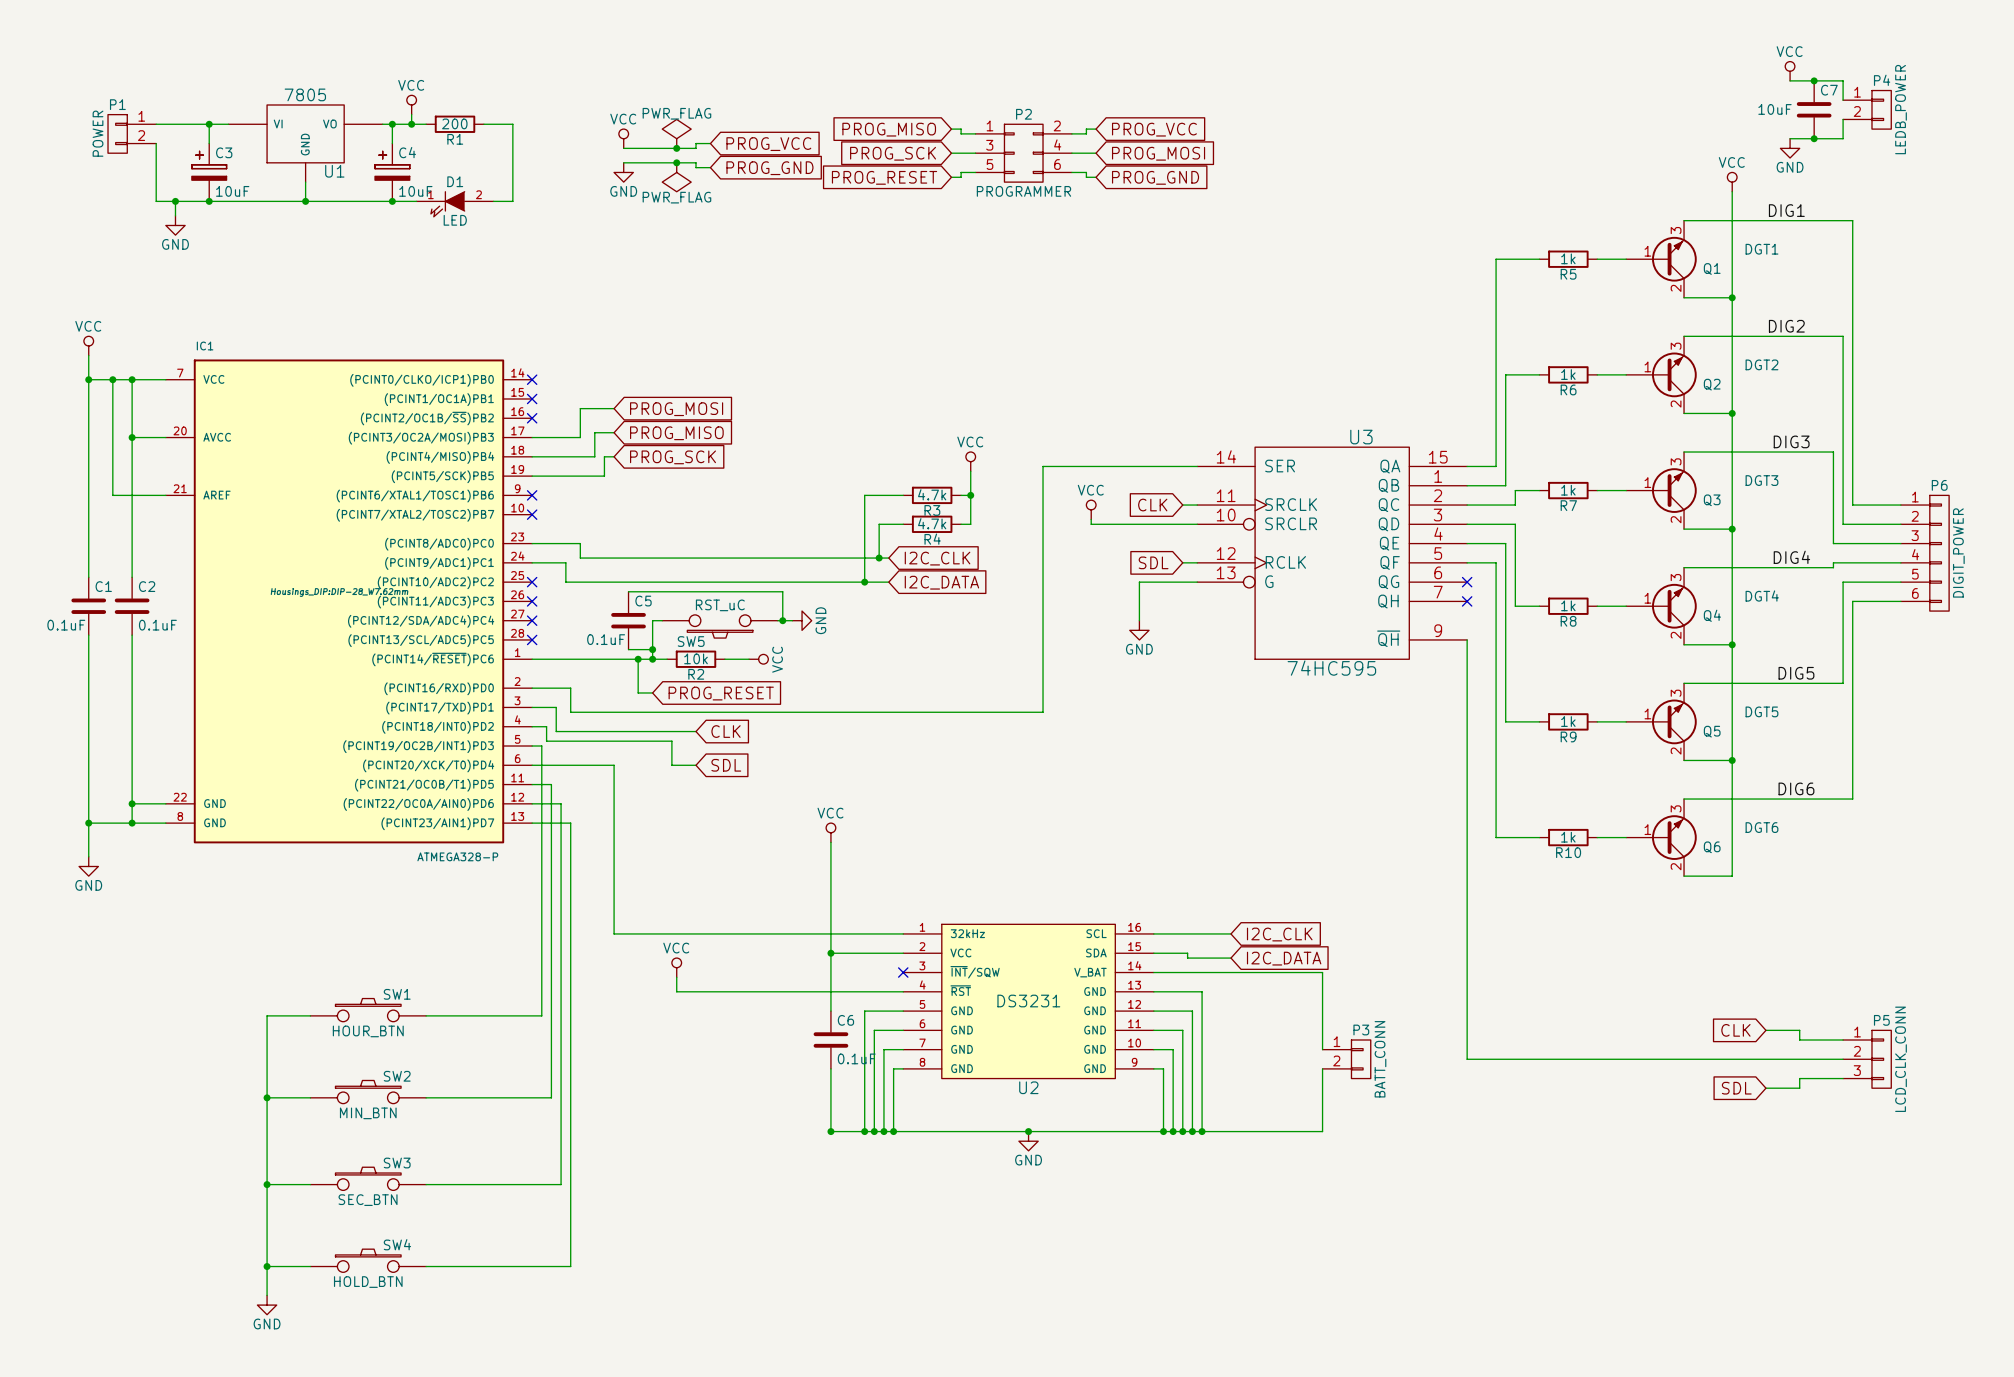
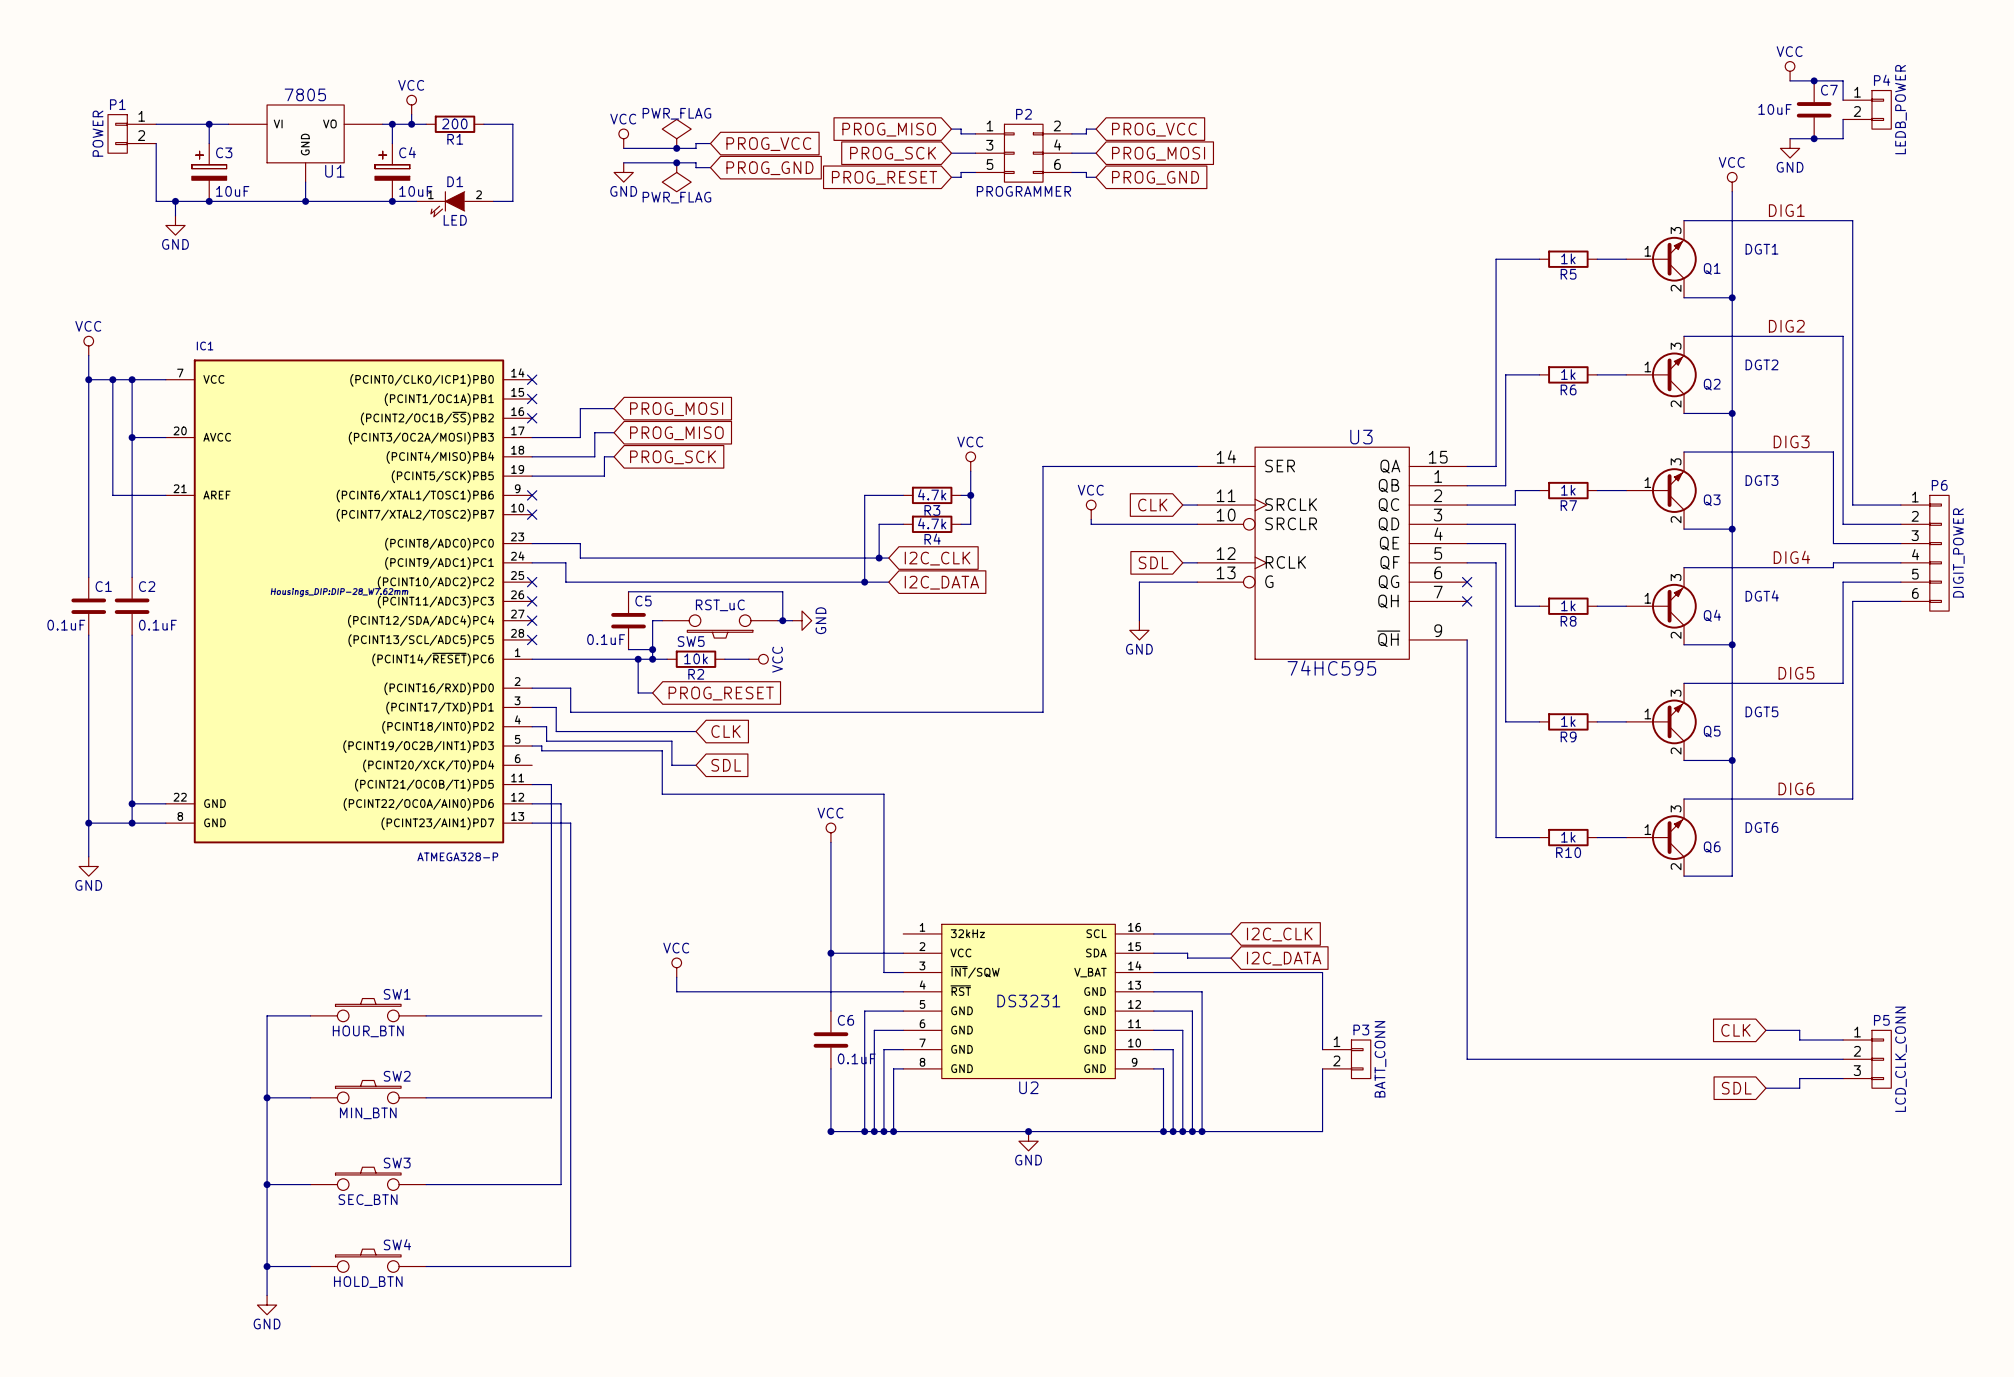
wire: (541, 750) (541, 1015) -> (541, 750) (662, 750) (662, 794) (883, 794) (883, 972) (903, 972)
wire: (532, 765) (614, 765) (614, 933) (903, 933) -> none
no-connect mark: (903, 972) -> none

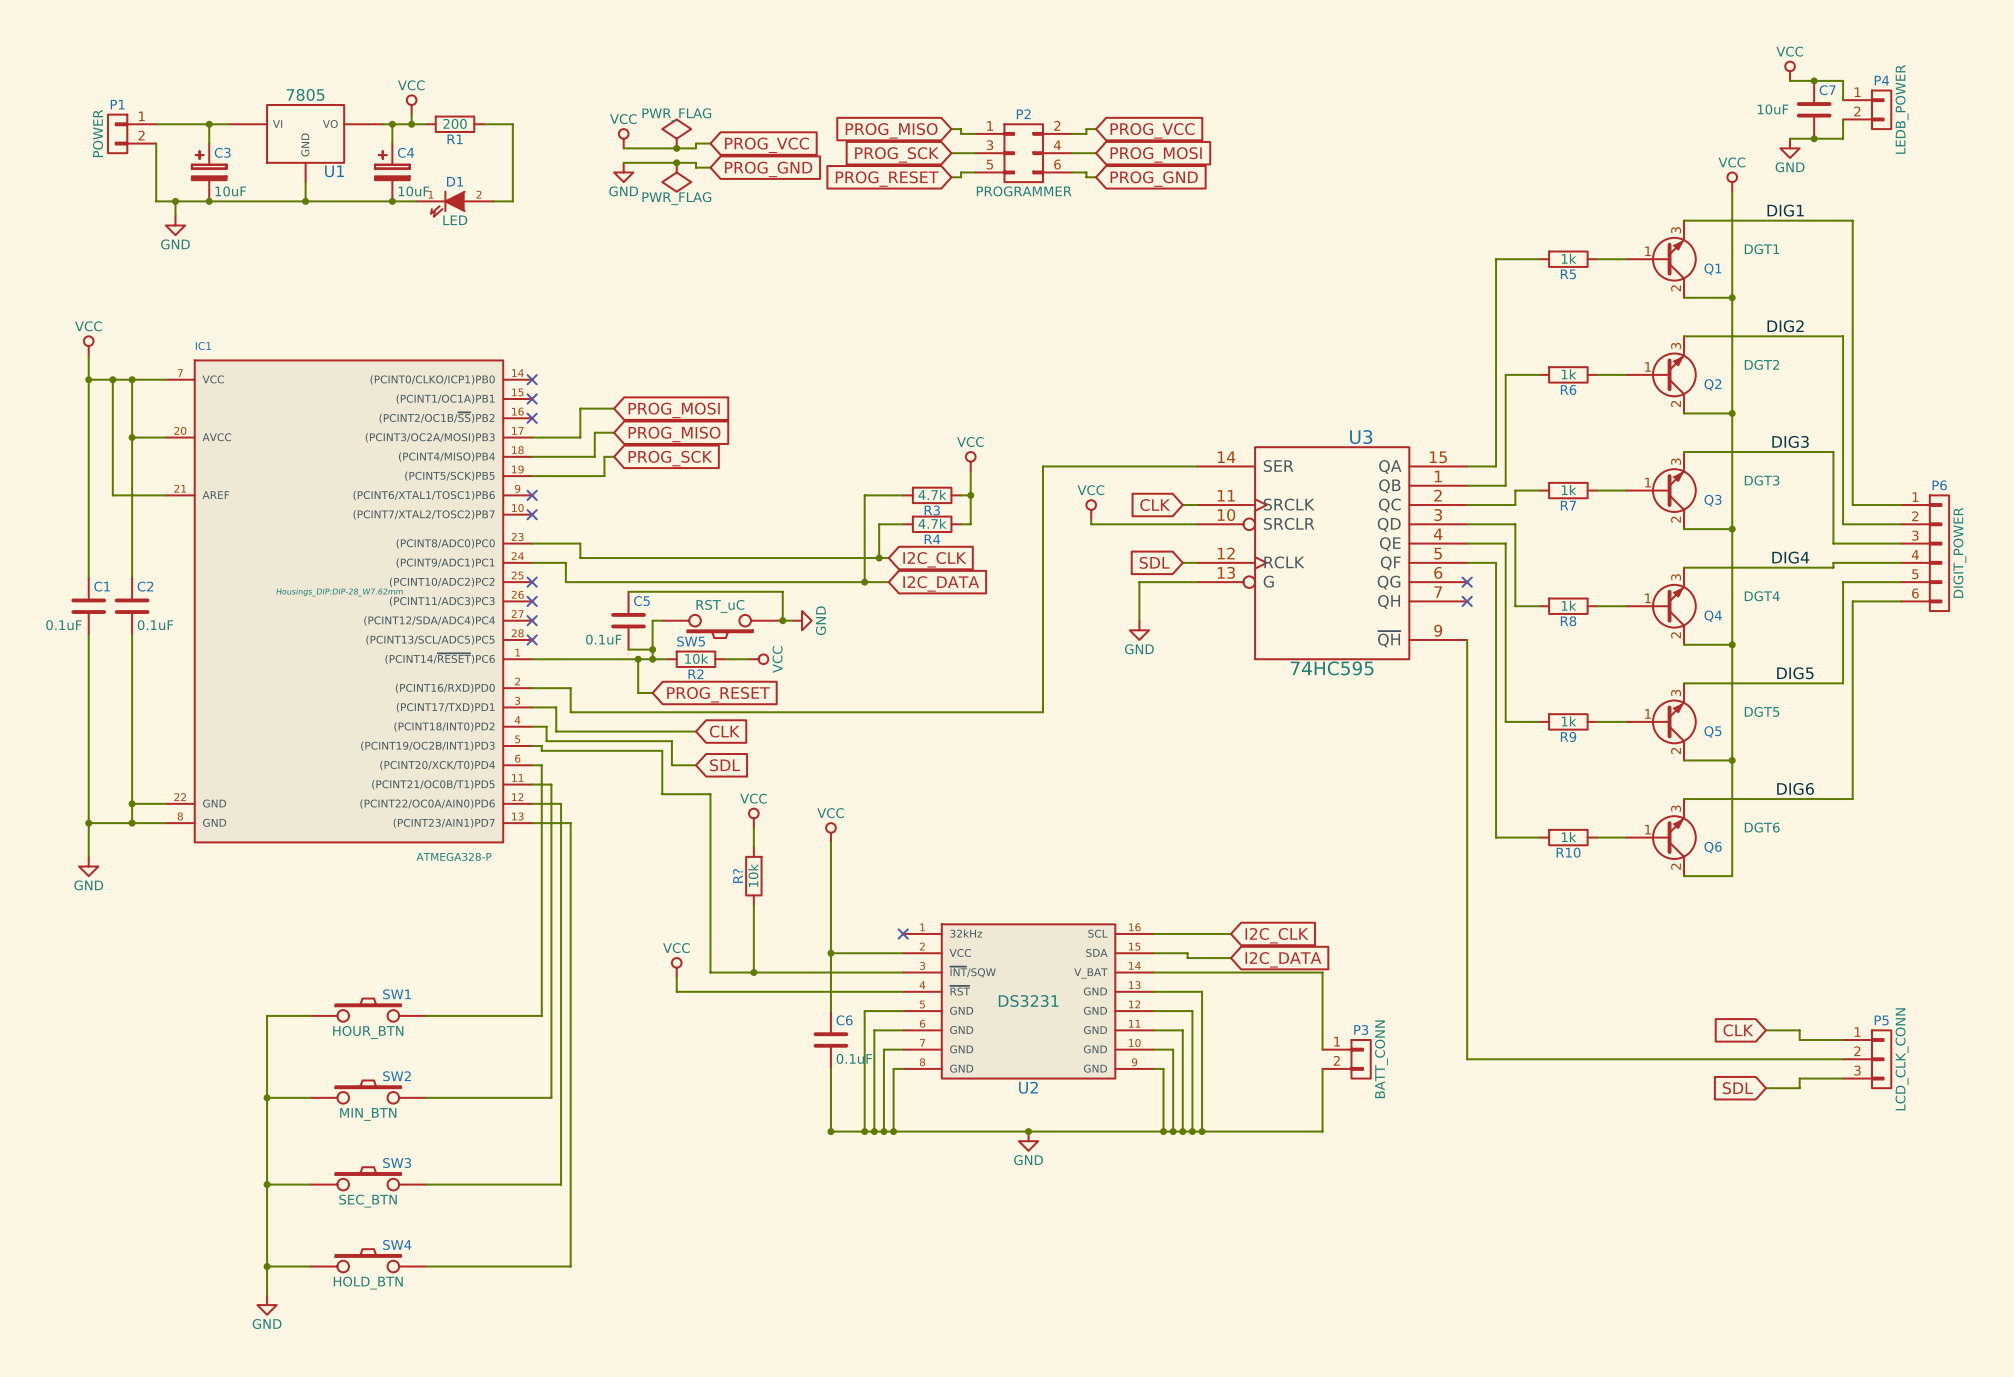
wire: none -> (532, 765) (541, 765) (541, 1015)
wire: (710, 794) (883, 794) (883, 972) -> (710, 794) (710, 972) (883, 972)
power symbol: none -> VCC (753, 818)
wire: none -> (753, 827) (753, 847)
R?: none -> 10k (753, 876)
wire: none -> (753, 905) (753, 972)
no-connect mark: none -> (903, 933)
junction: none -> (753, 972)

